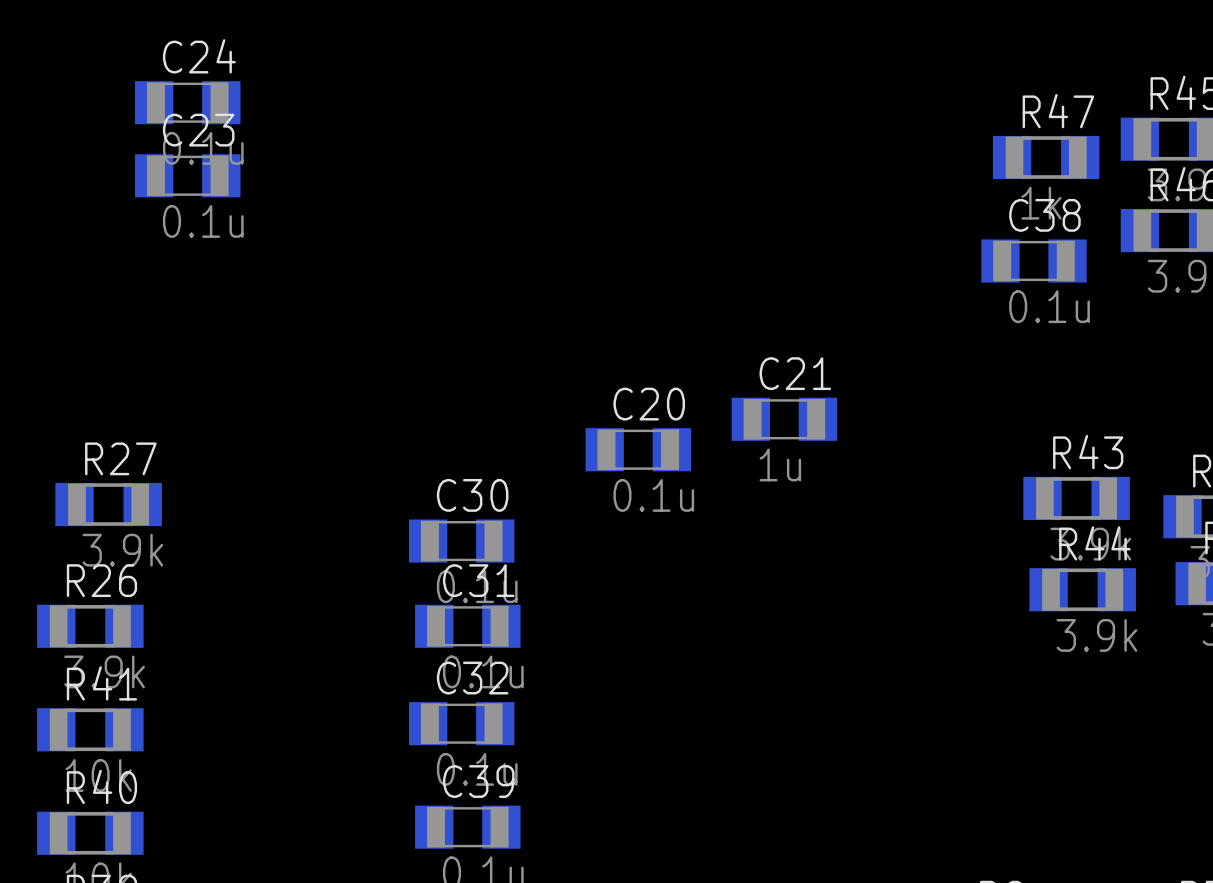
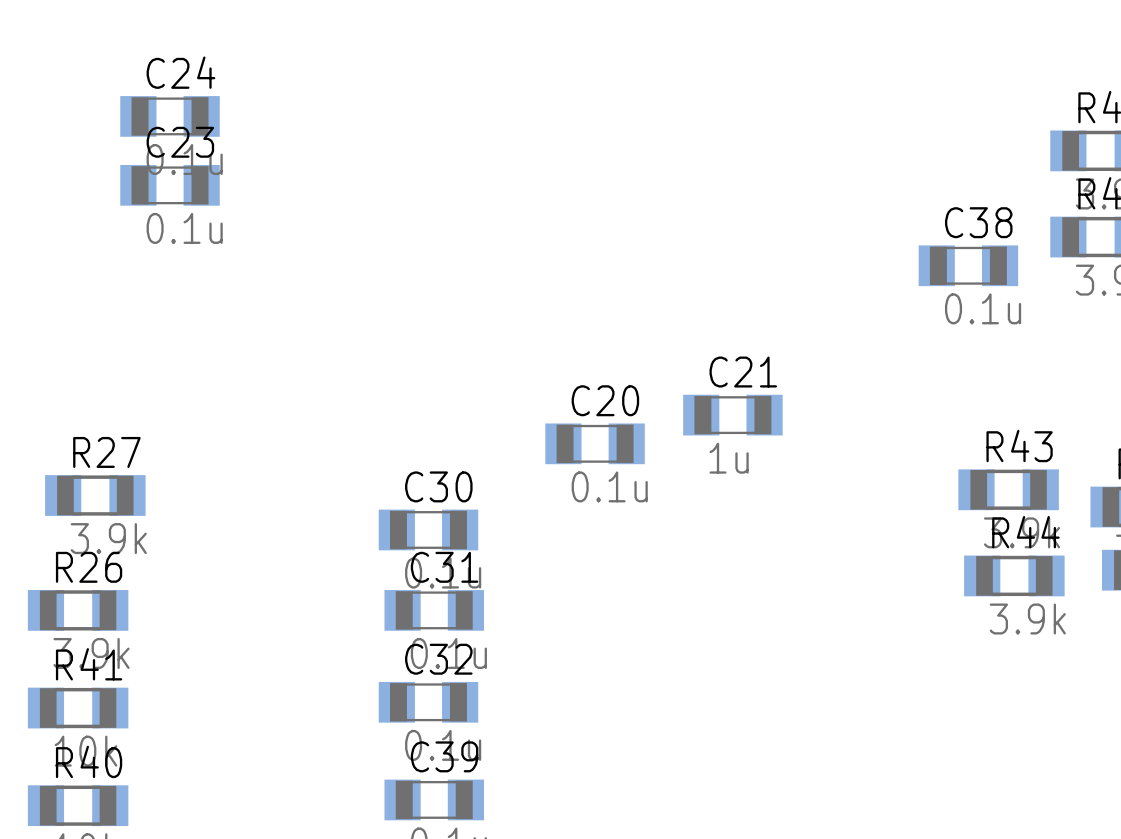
R47: 1k (1046, 157) -> none

